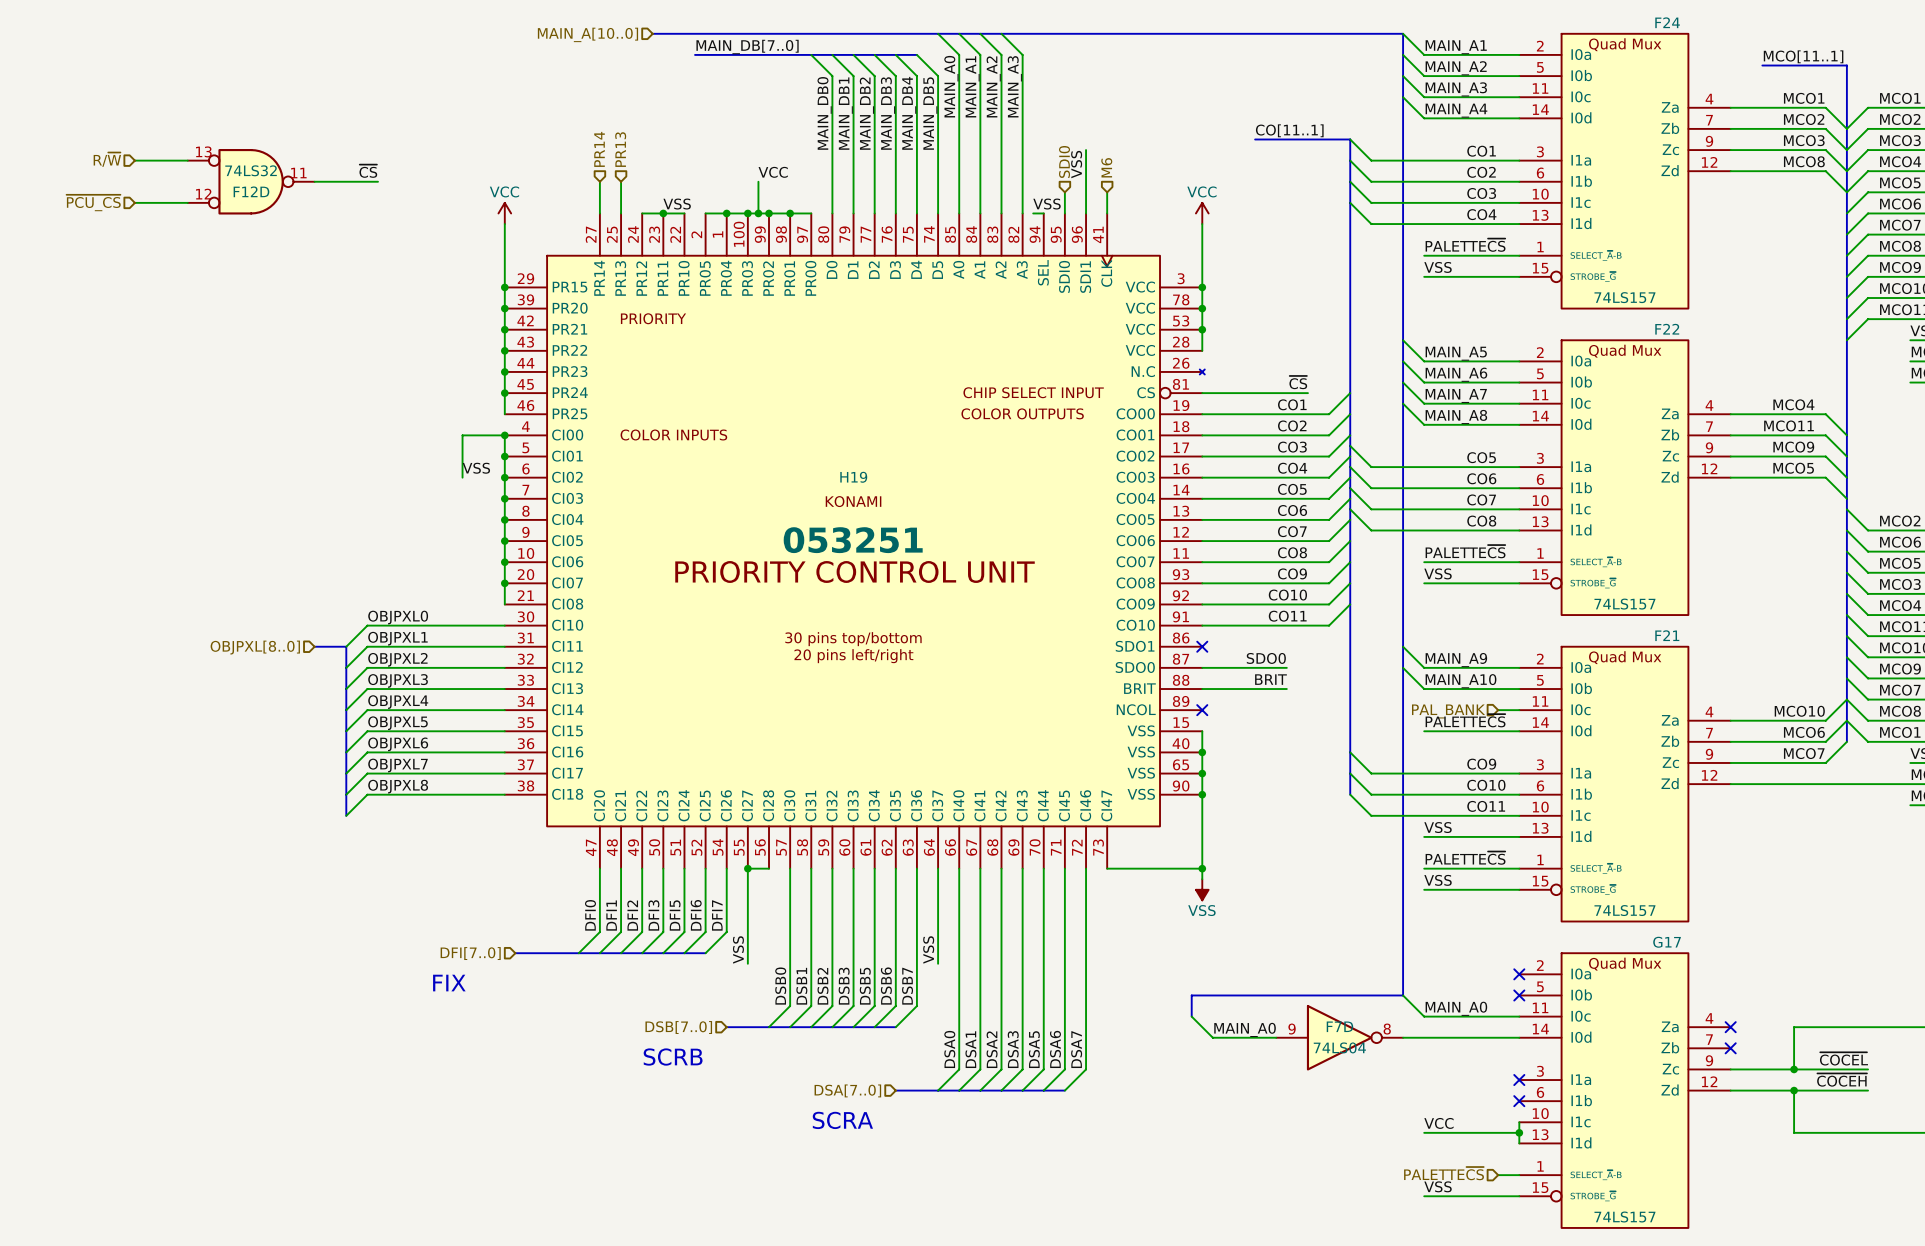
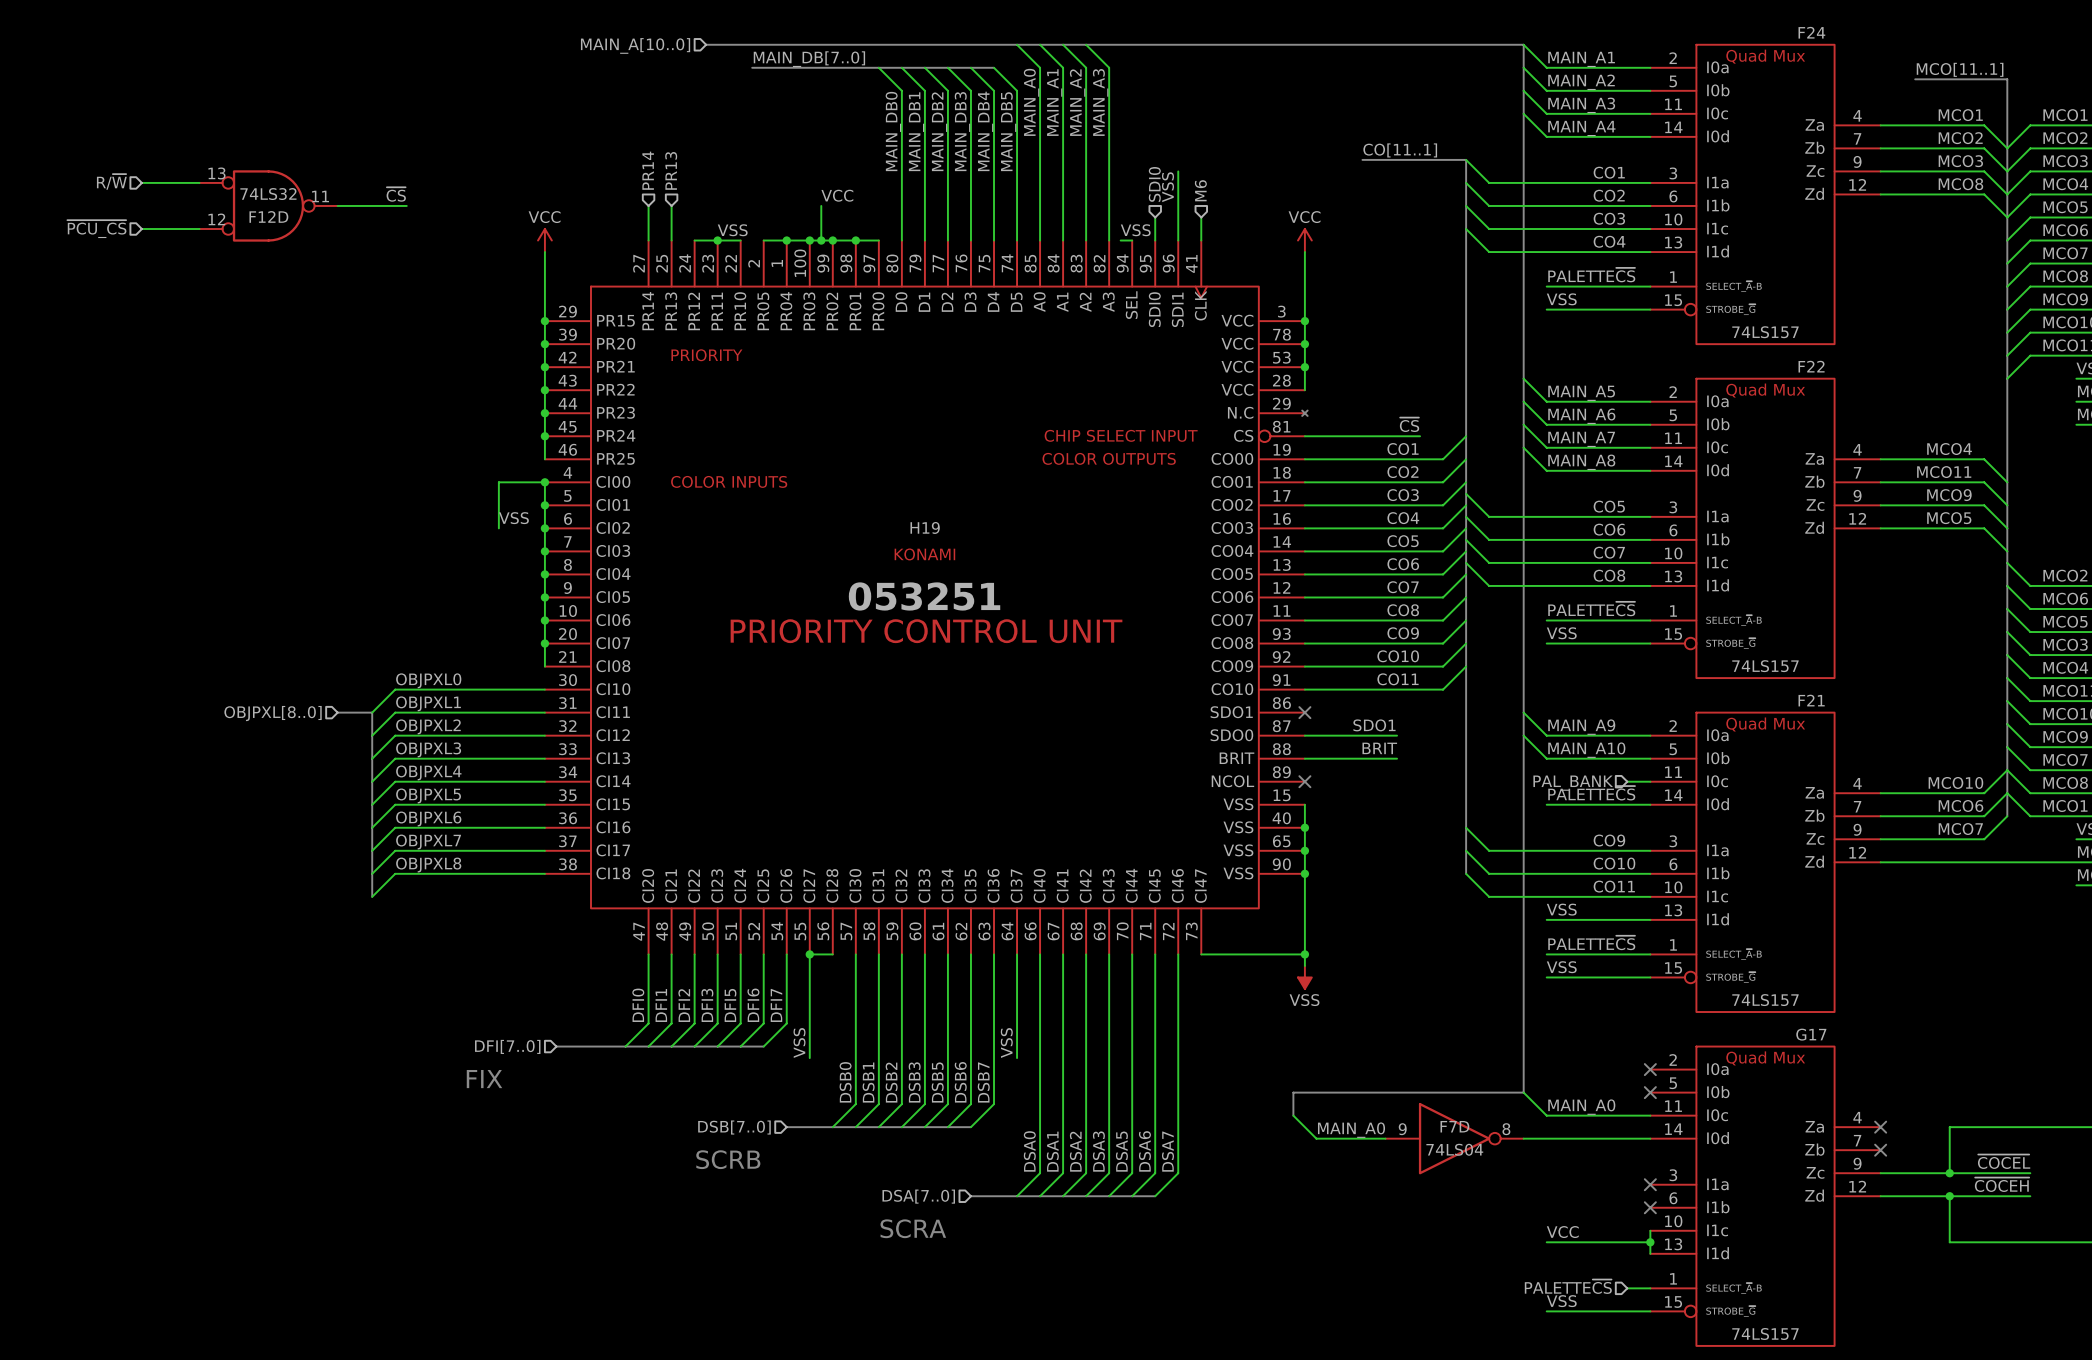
H19 pin number: 26 (1181, 363) -> 29 (1281, 403)
H19 text: 30 pins top/bottom (853, 639) -> none
H19 text: 20 pins left/right (853, 656) -> none
label: SDO0 (1266, 658) -> SDO1 (1374, 725)

